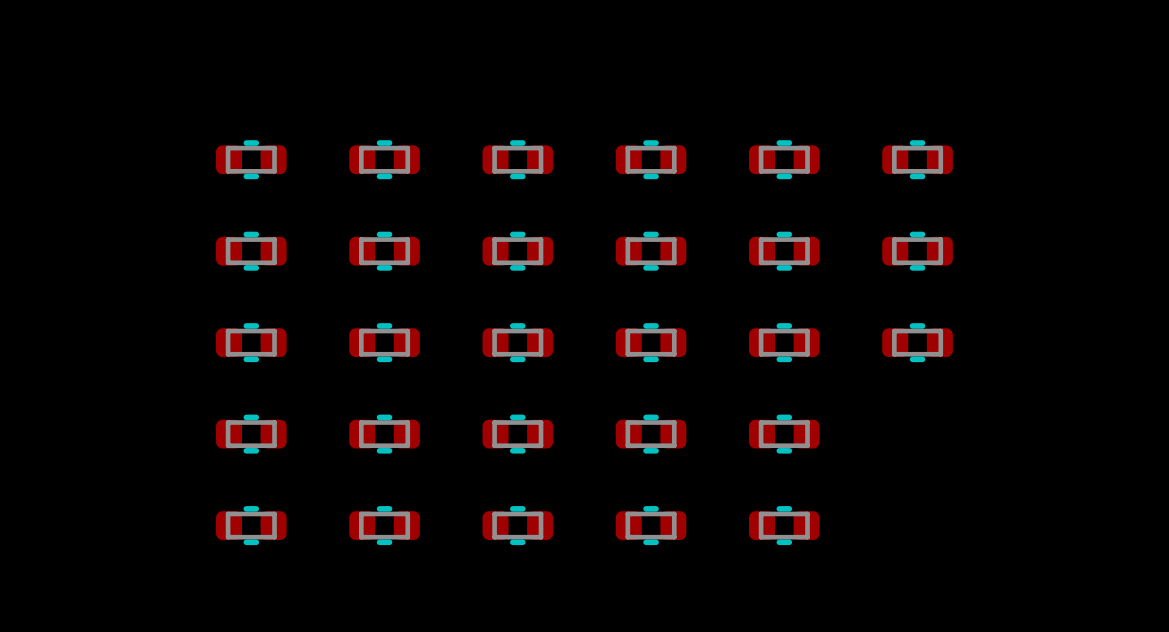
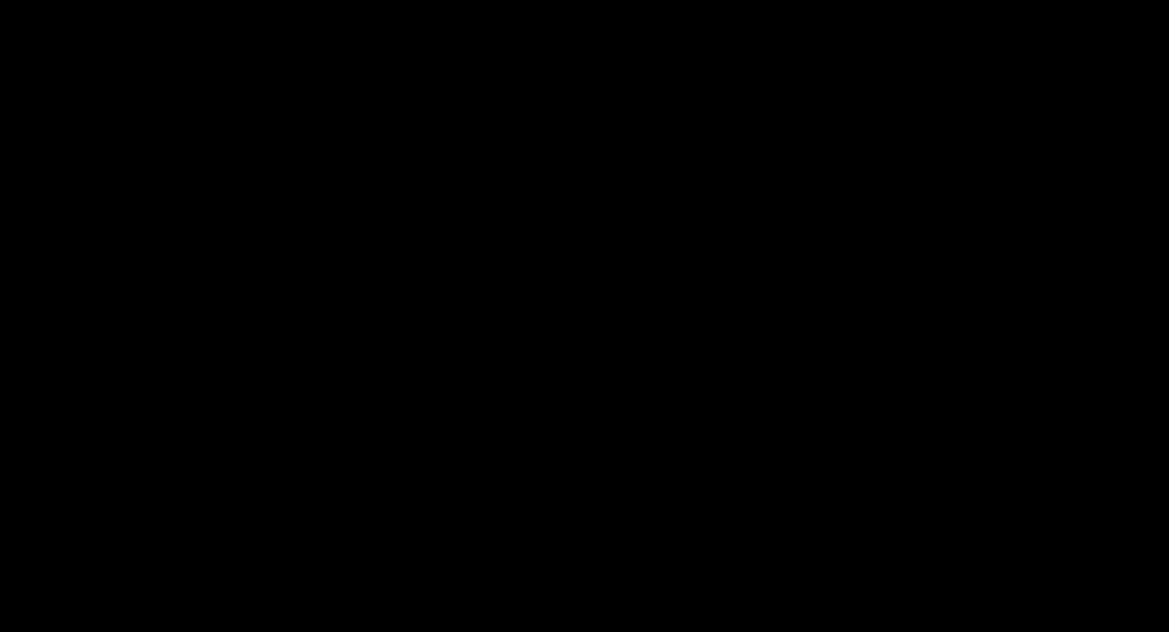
part: (251, 159) -> none
part: (384, 159) -> none
part: (517, 159) -> none
part: (651, 159) -> none
part: (784, 159) -> none
part: (917, 159) -> none
part: (251, 251) -> none
part: (384, 251) -> none
part: (517, 251) -> none
part: (651, 251) -> none
part: (784, 251) -> none
part: (917, 251) -> none
part: (251, 342) -> none
part: (384, 342) -> none
part: (517, 342) -> none
part: (651, 342) -> none
part: (784, 342) -> none
part: (917, 342) -> none
part: (251, 434) -> none
part: (384, 434) -> none
part: (517, 434) -> none
part: (651, 434) -> none
part: (784, 434) -> none
part: (251, 525) -> none
part: (384, 525) -> none
part: (517, 525) -> none
part: (651, 525) -> none
part: (784, 525) -> none

